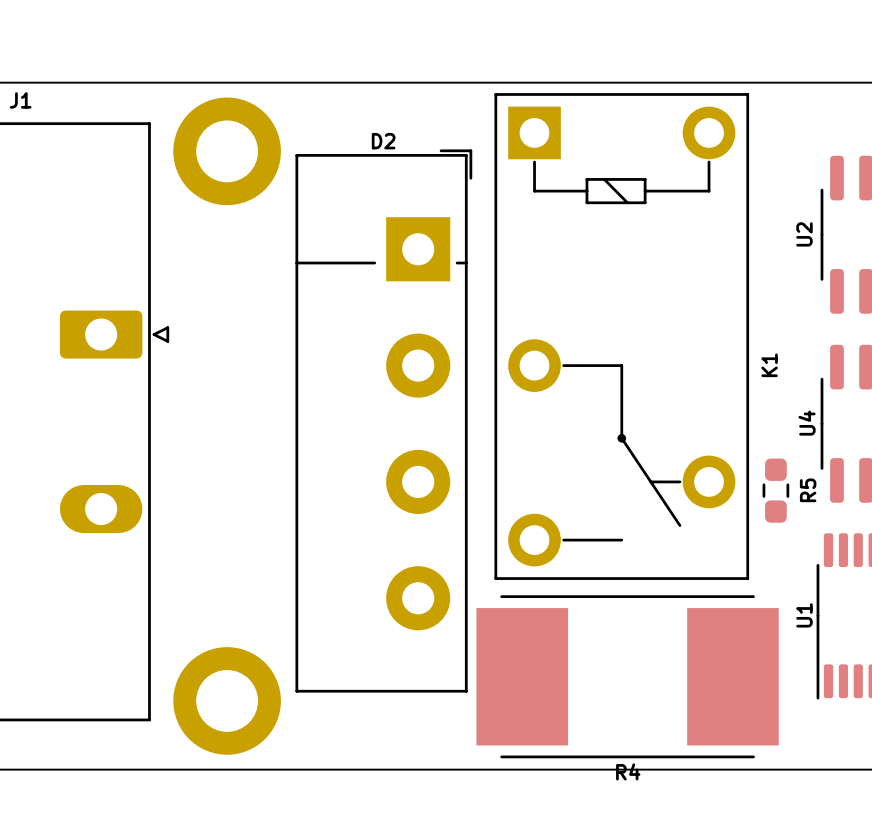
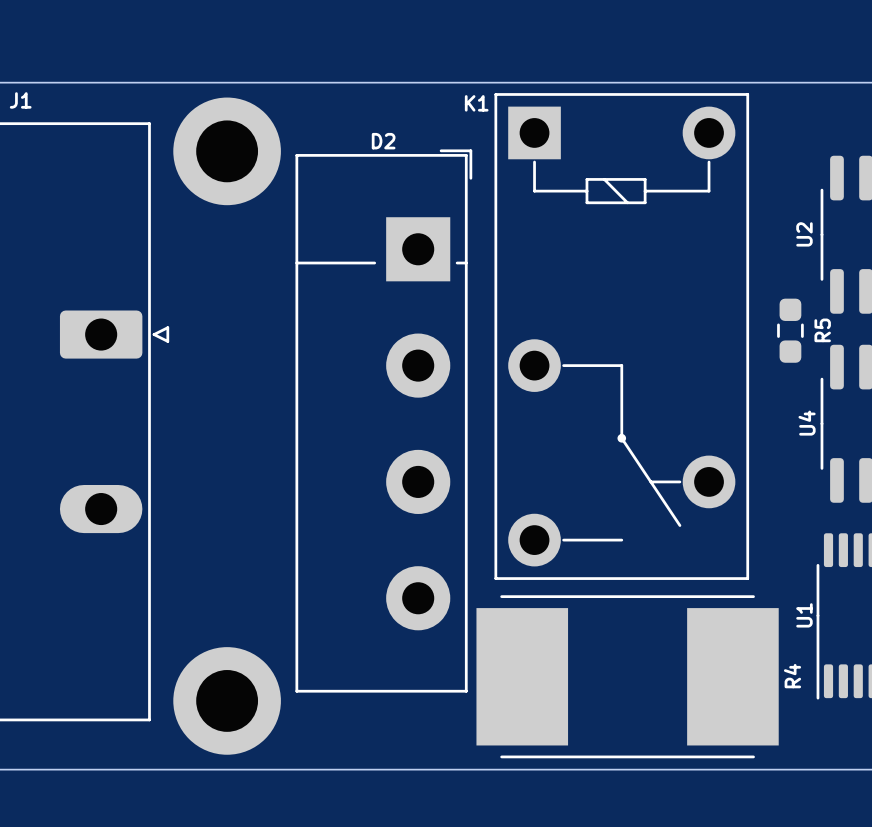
K1 name rotation: 0° (769, 365) -> 90° clockwise (476, 103)
K1 name position: K1 (769, 365) -> K1 (476, 103)
R5 position: (775, 490) -> (790, 330)
R4 name rotation: 0° (628, 771) -> 90° counterclockwise (792, 676)
R4 name position: R4 (628, 771) -> R4 (792, 676)

